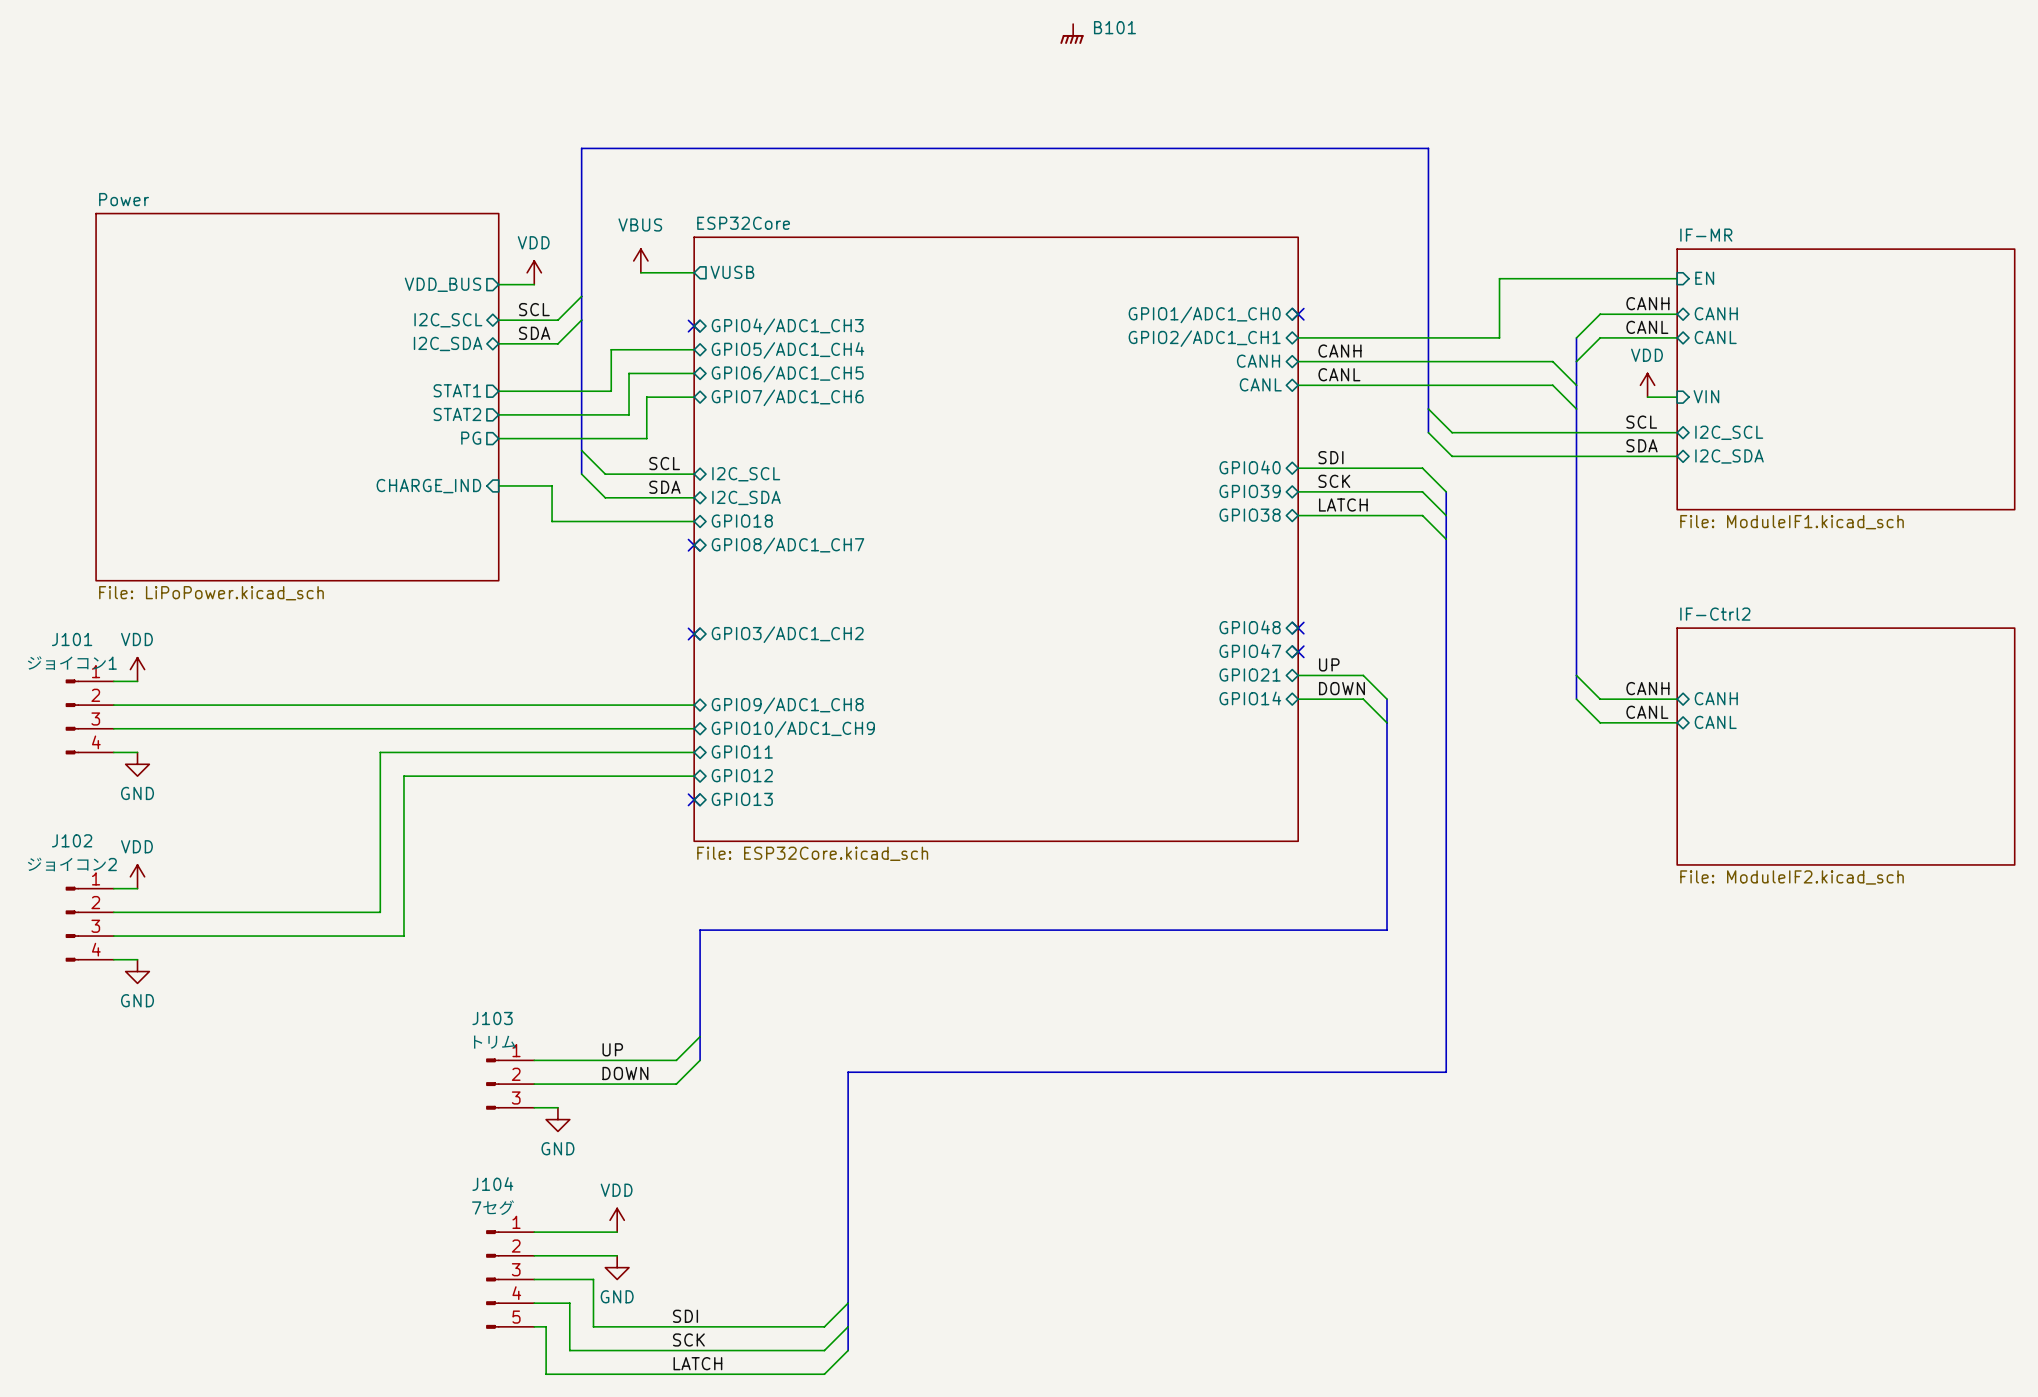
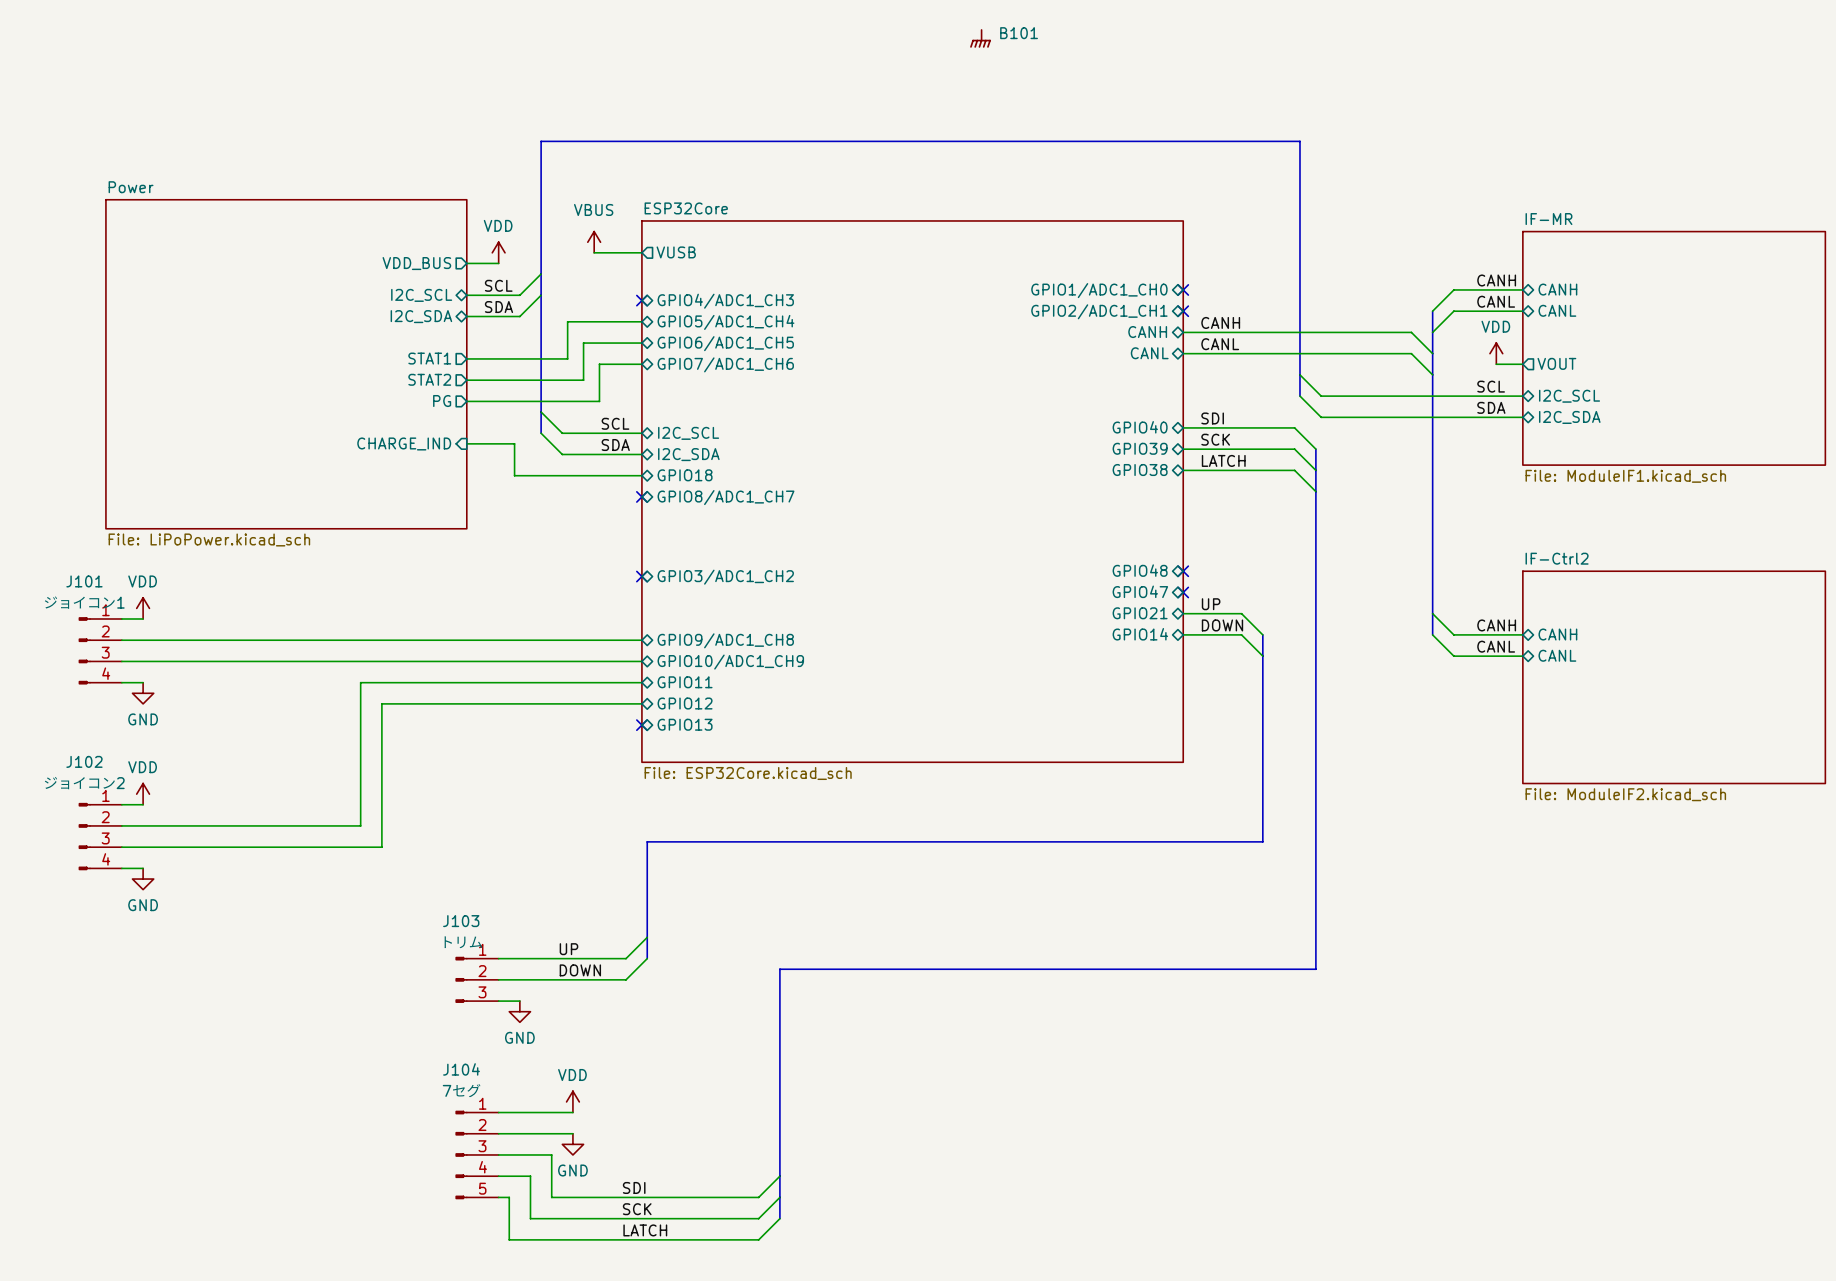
wire: (1677, 278) (1499, 278) (1499, 337) (1298, 337) -> none
sheet pin: EN (1704, 278) -> none
no-connect mark: none -> (1183, 311)
sheet pin shape: input (1706, 396) -> output (1556, 363)
sheet pin: VIN (1706, 396) -> VOUT (1556, 363)

